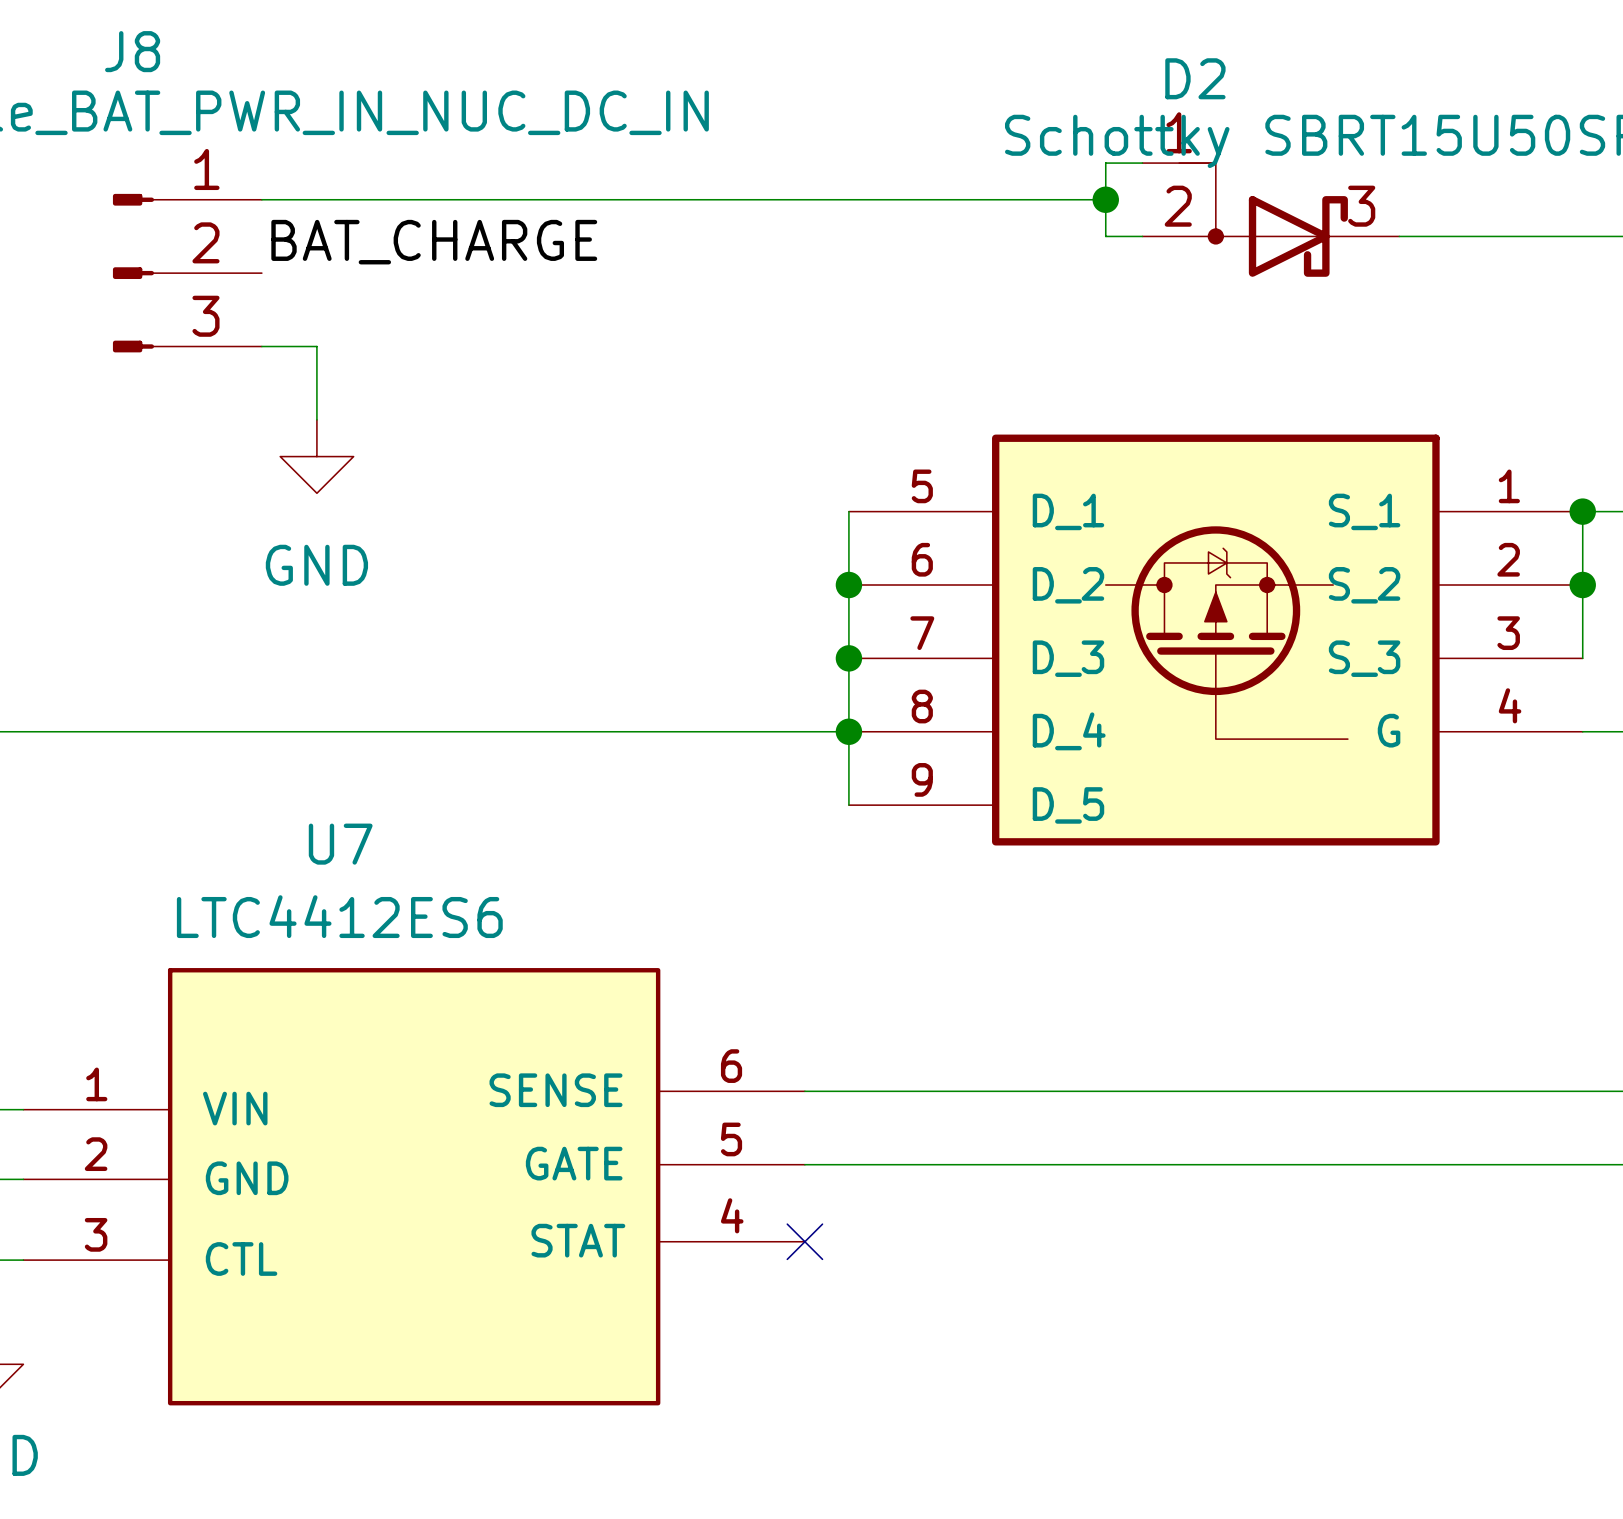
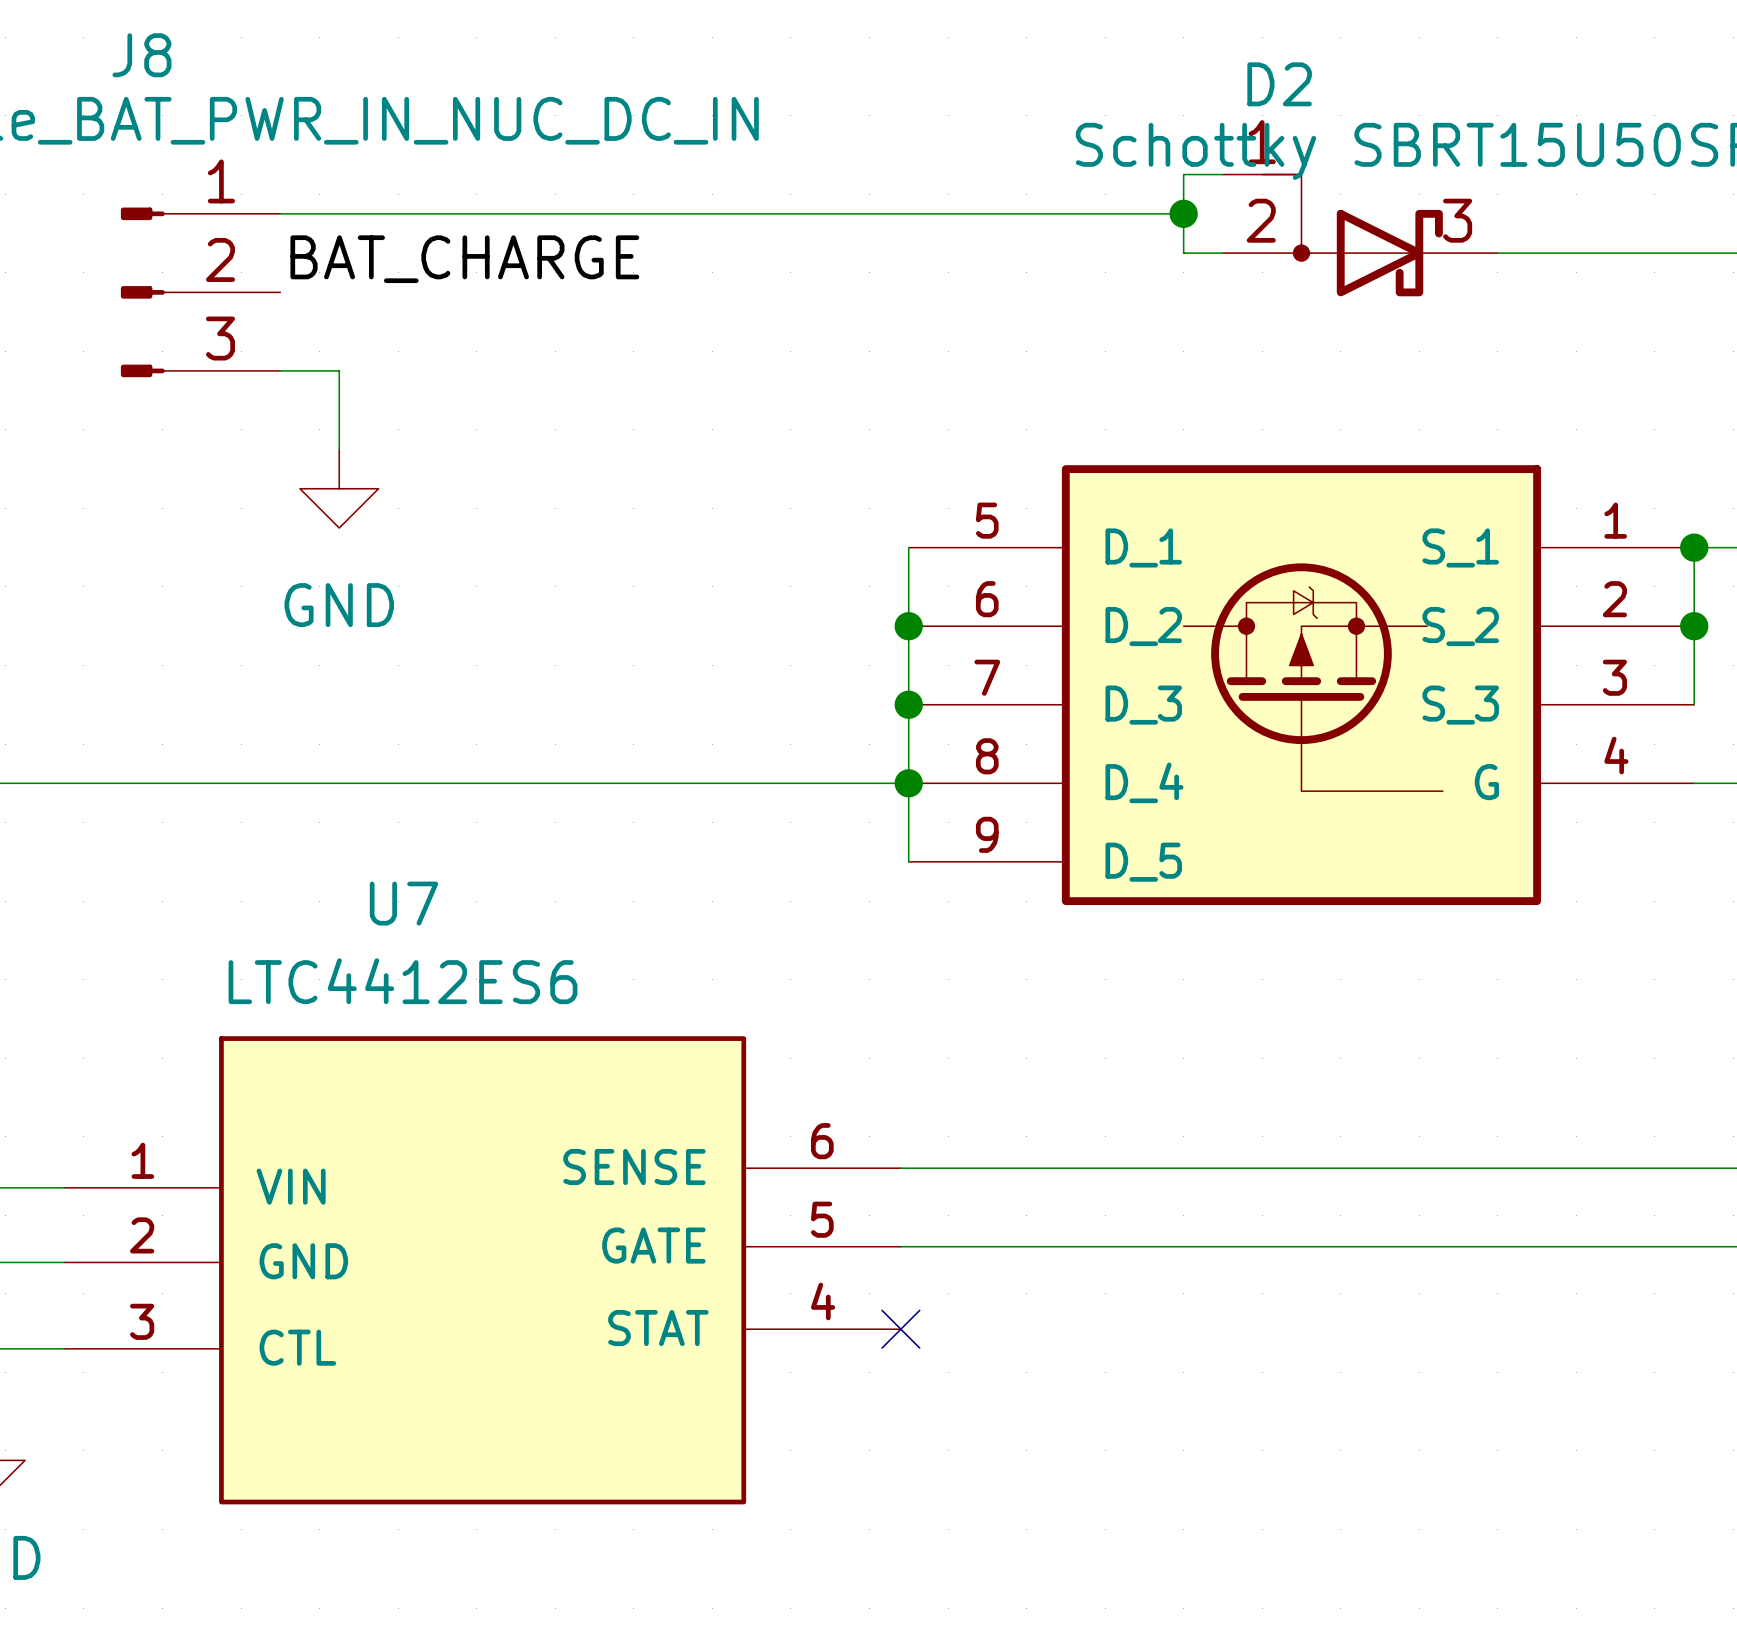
U7 position: (414, 1186) -> (482, 1270)
no-connect mark position: (804, 1241) -> (900, 1329)

